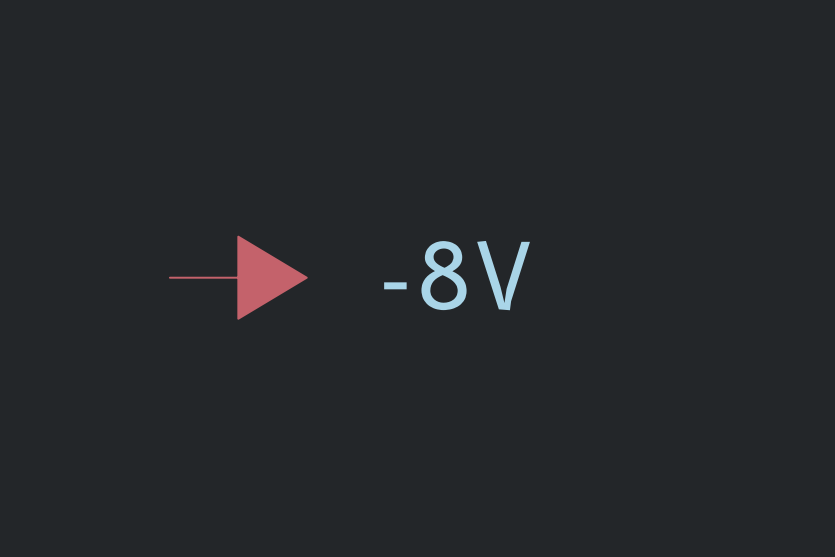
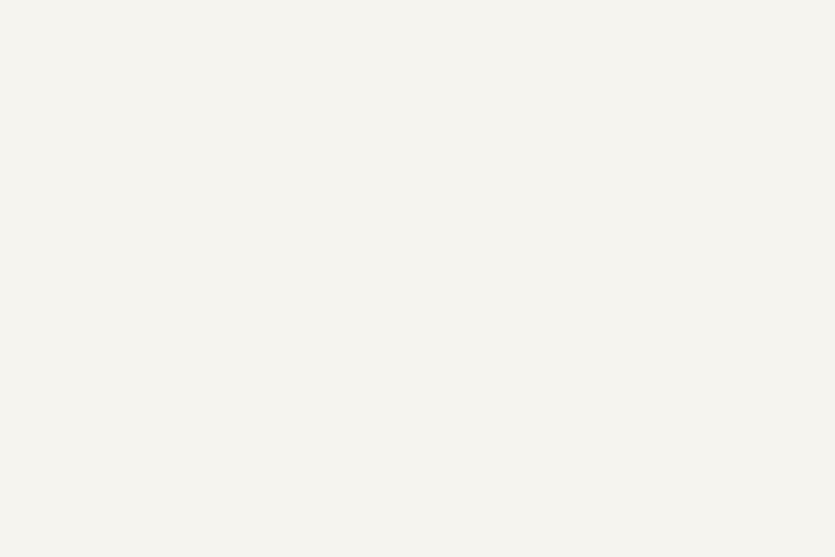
power symbol: -8V (238, 277) -> none

